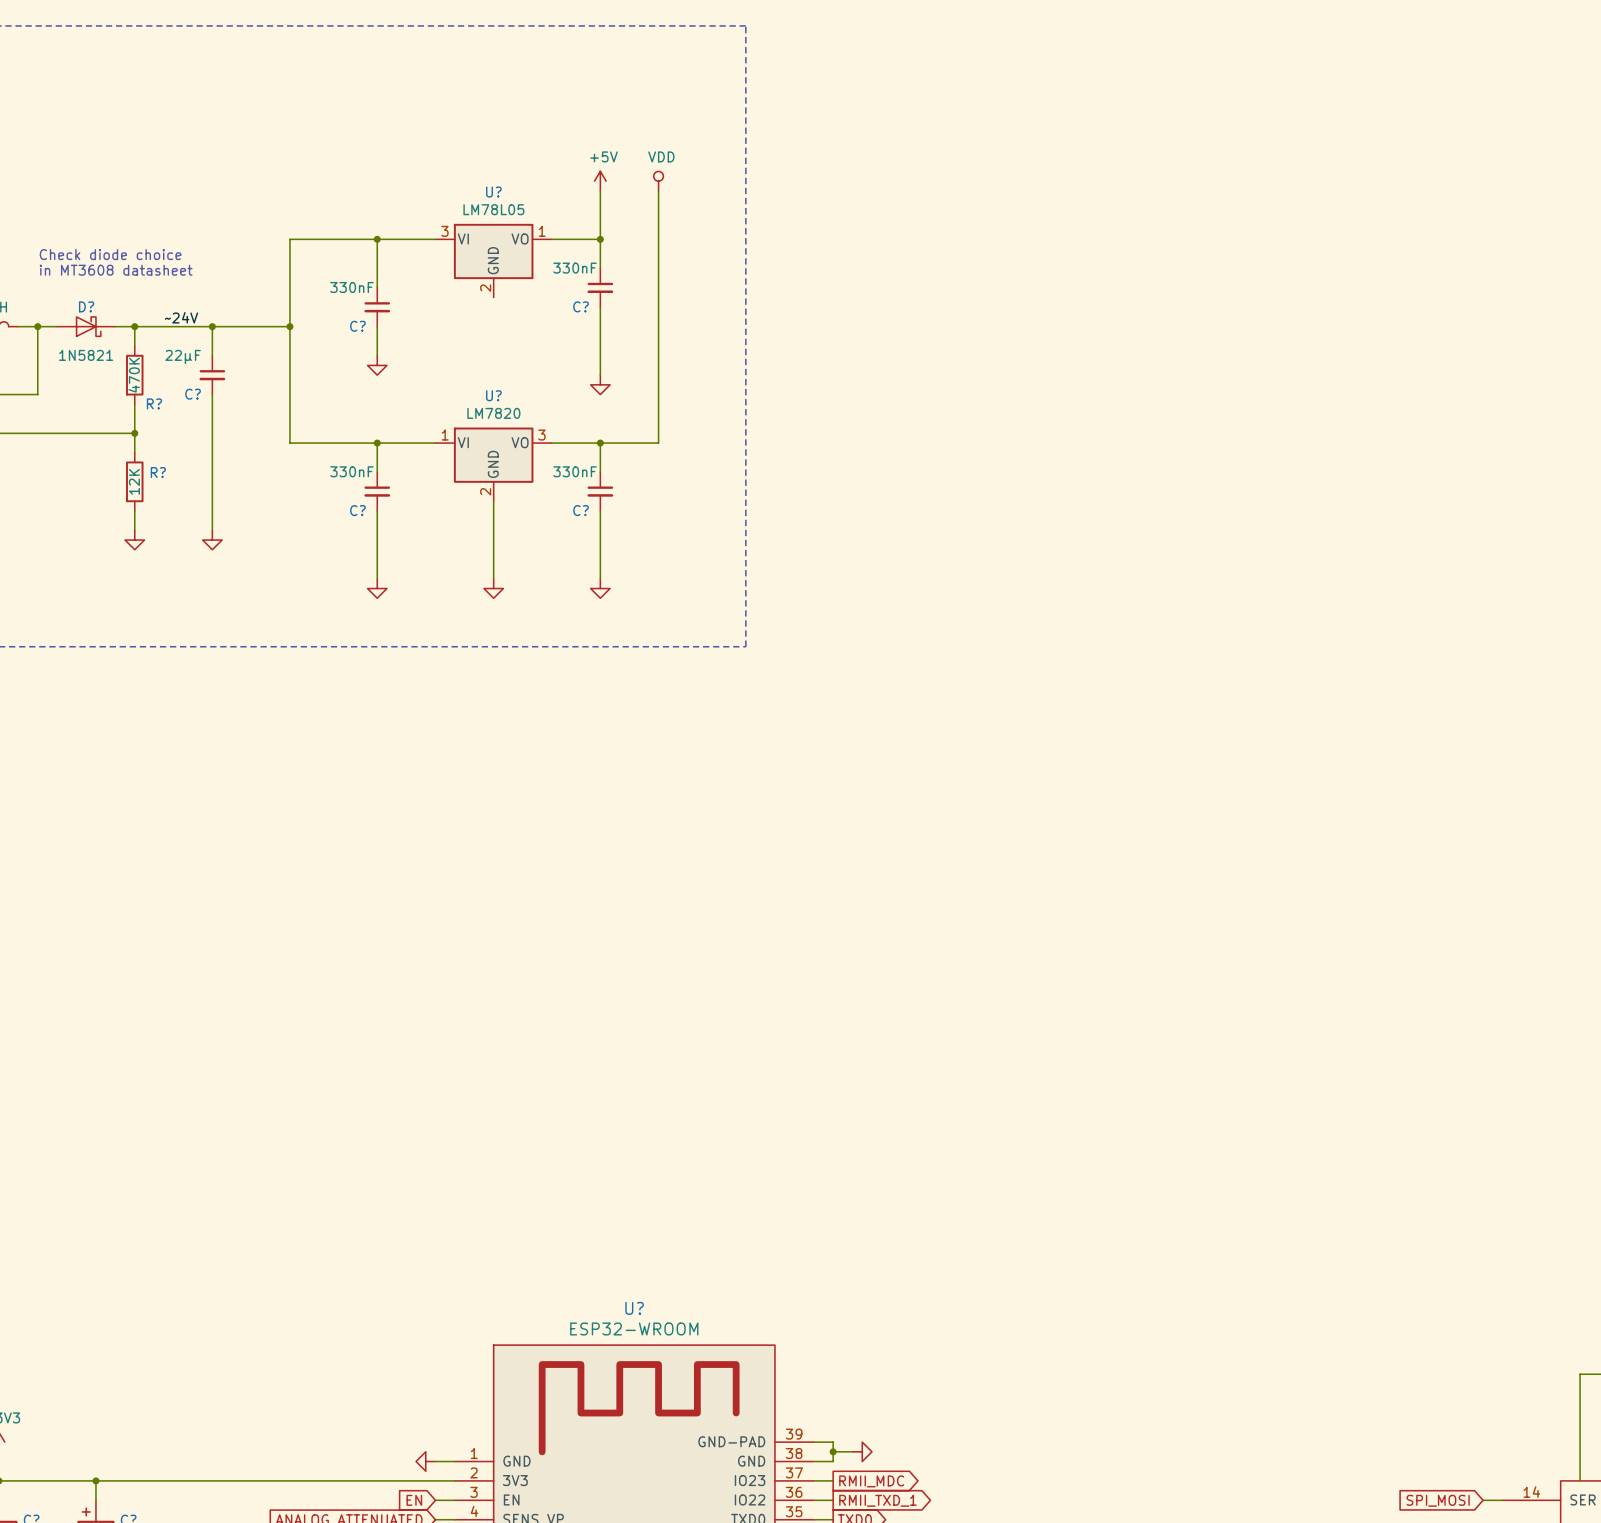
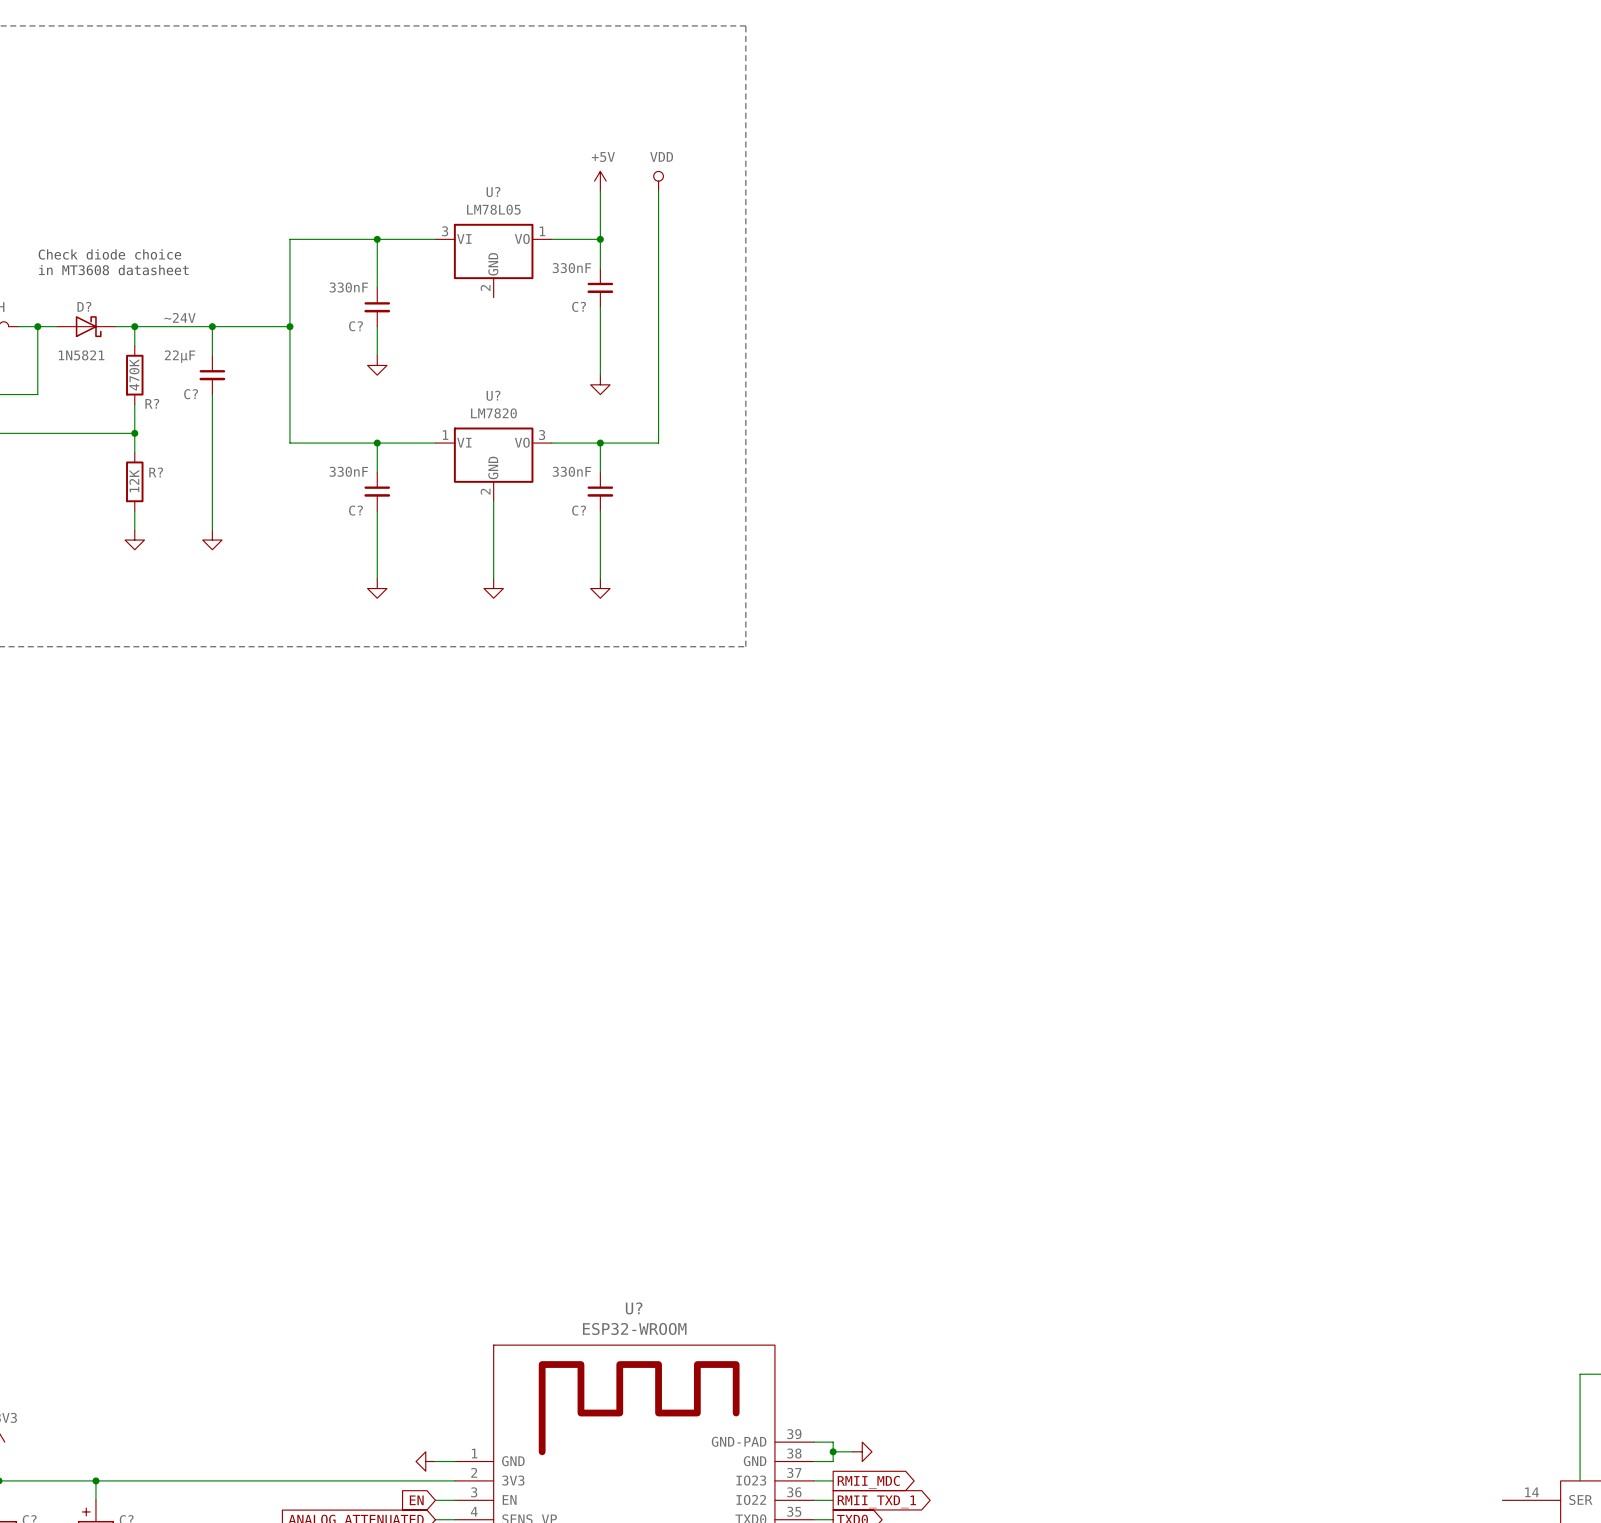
global label: SPI_MOSI (1438, 1500) -> none
wire: (1483, 1500) (1502, 1500) -> none

